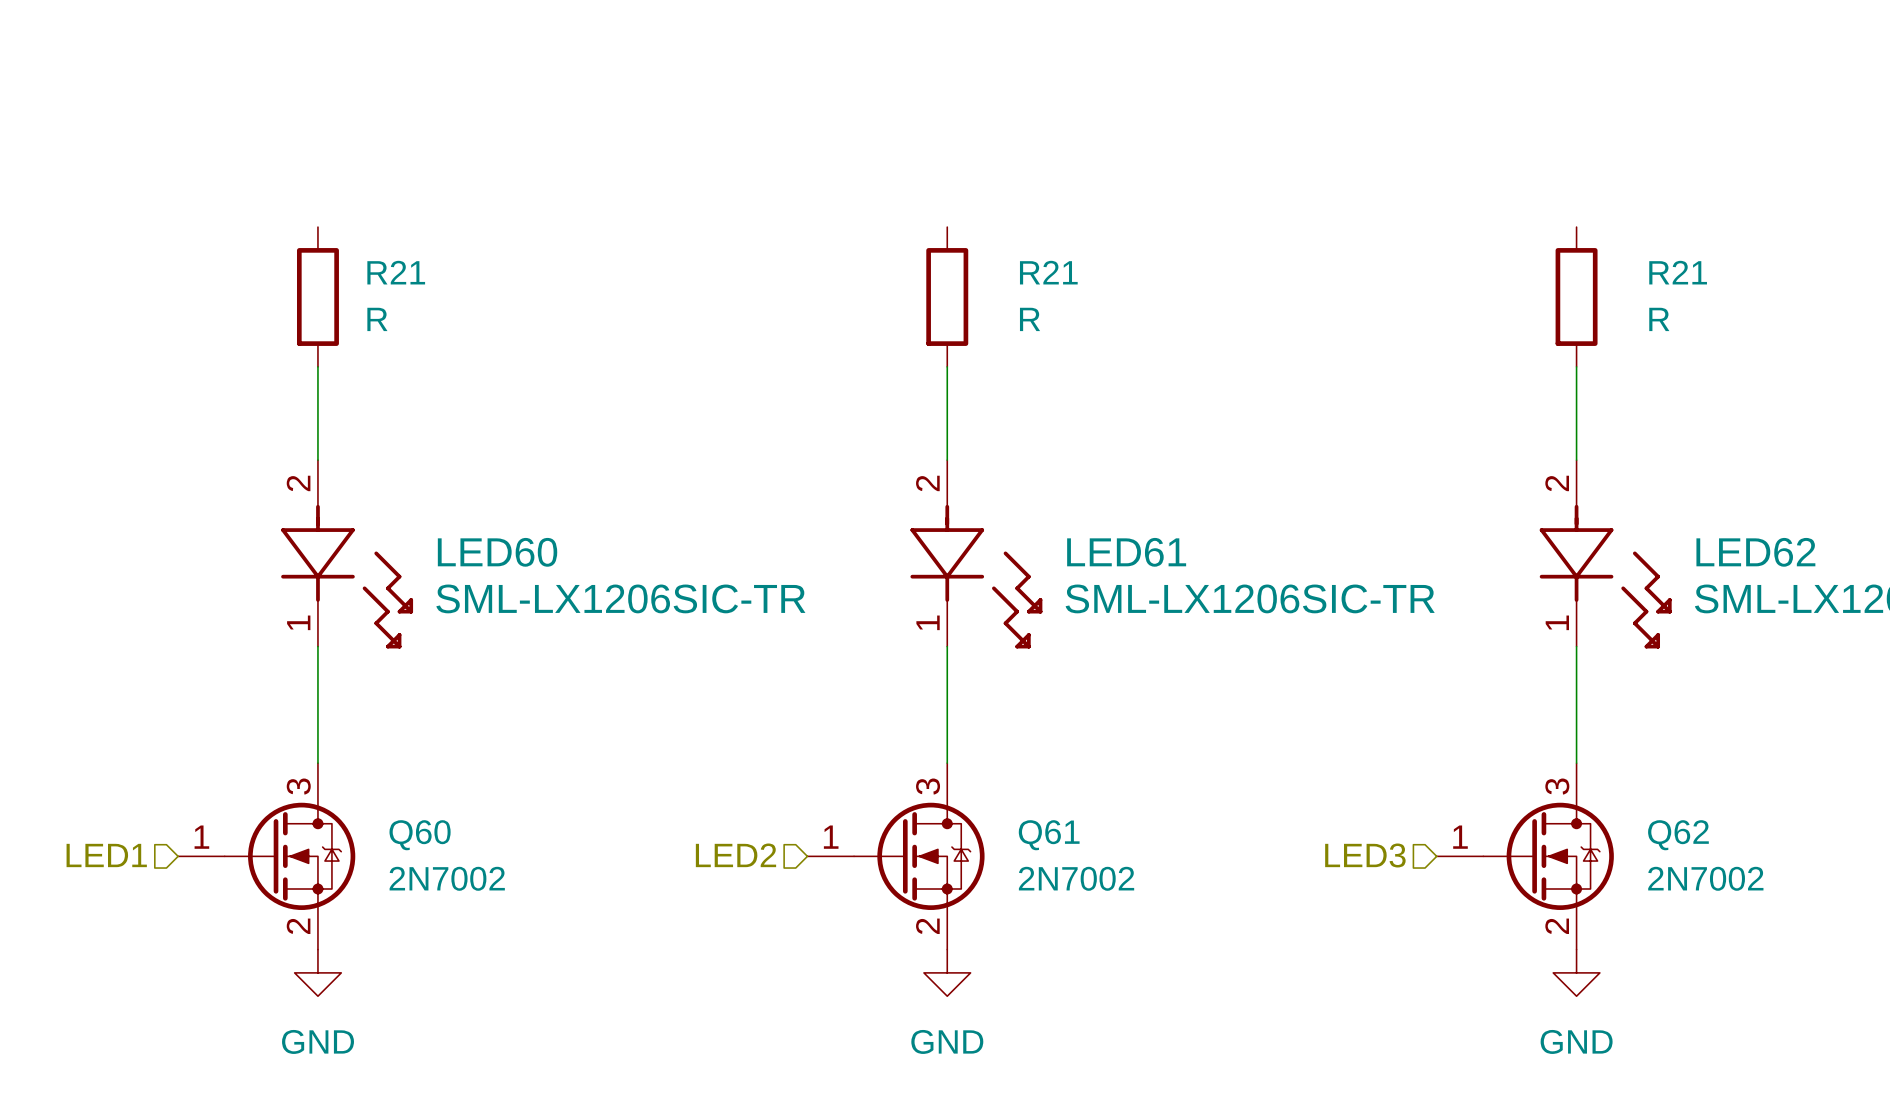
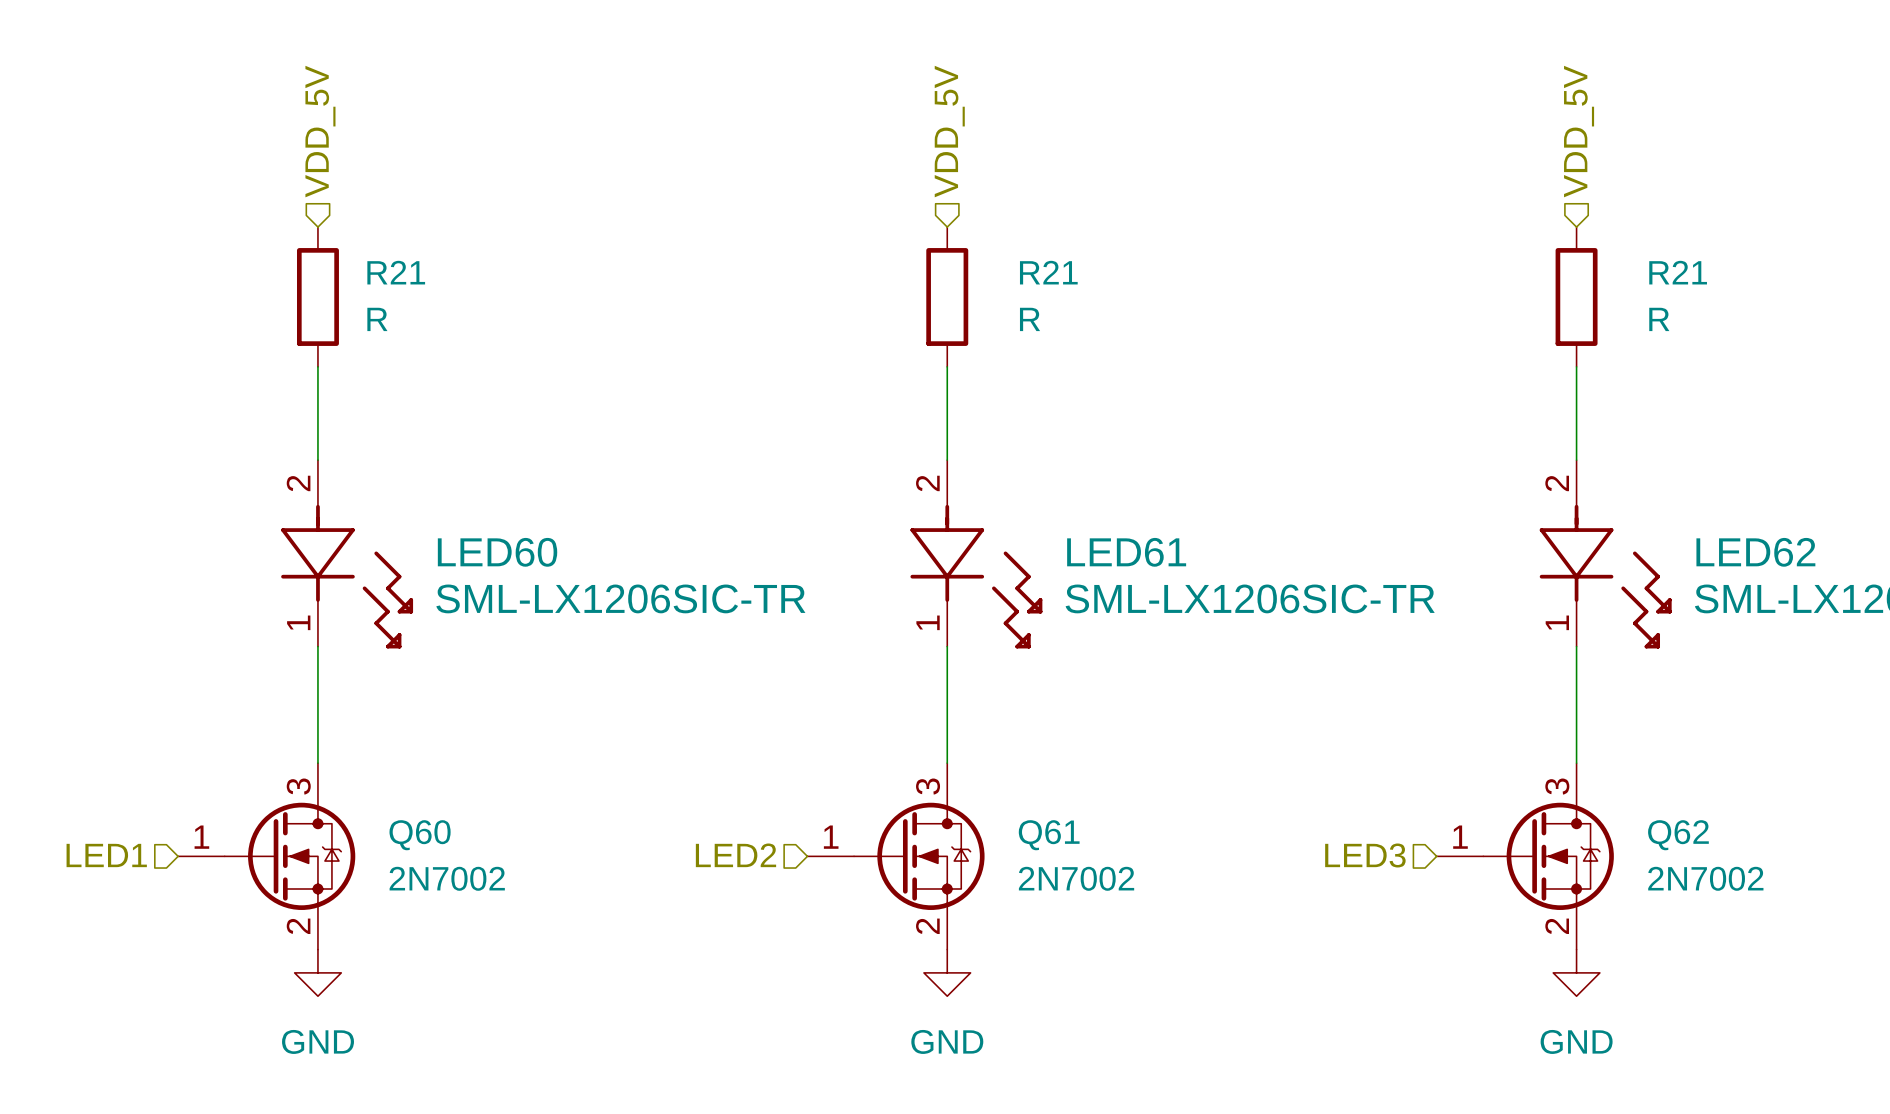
hierarchical label: none -> VDD_5V (320, 131)
hierarchical label: none -> VDD_5V (949, 131)
hierarchical label: none -> VDD_5V (1579, 131)

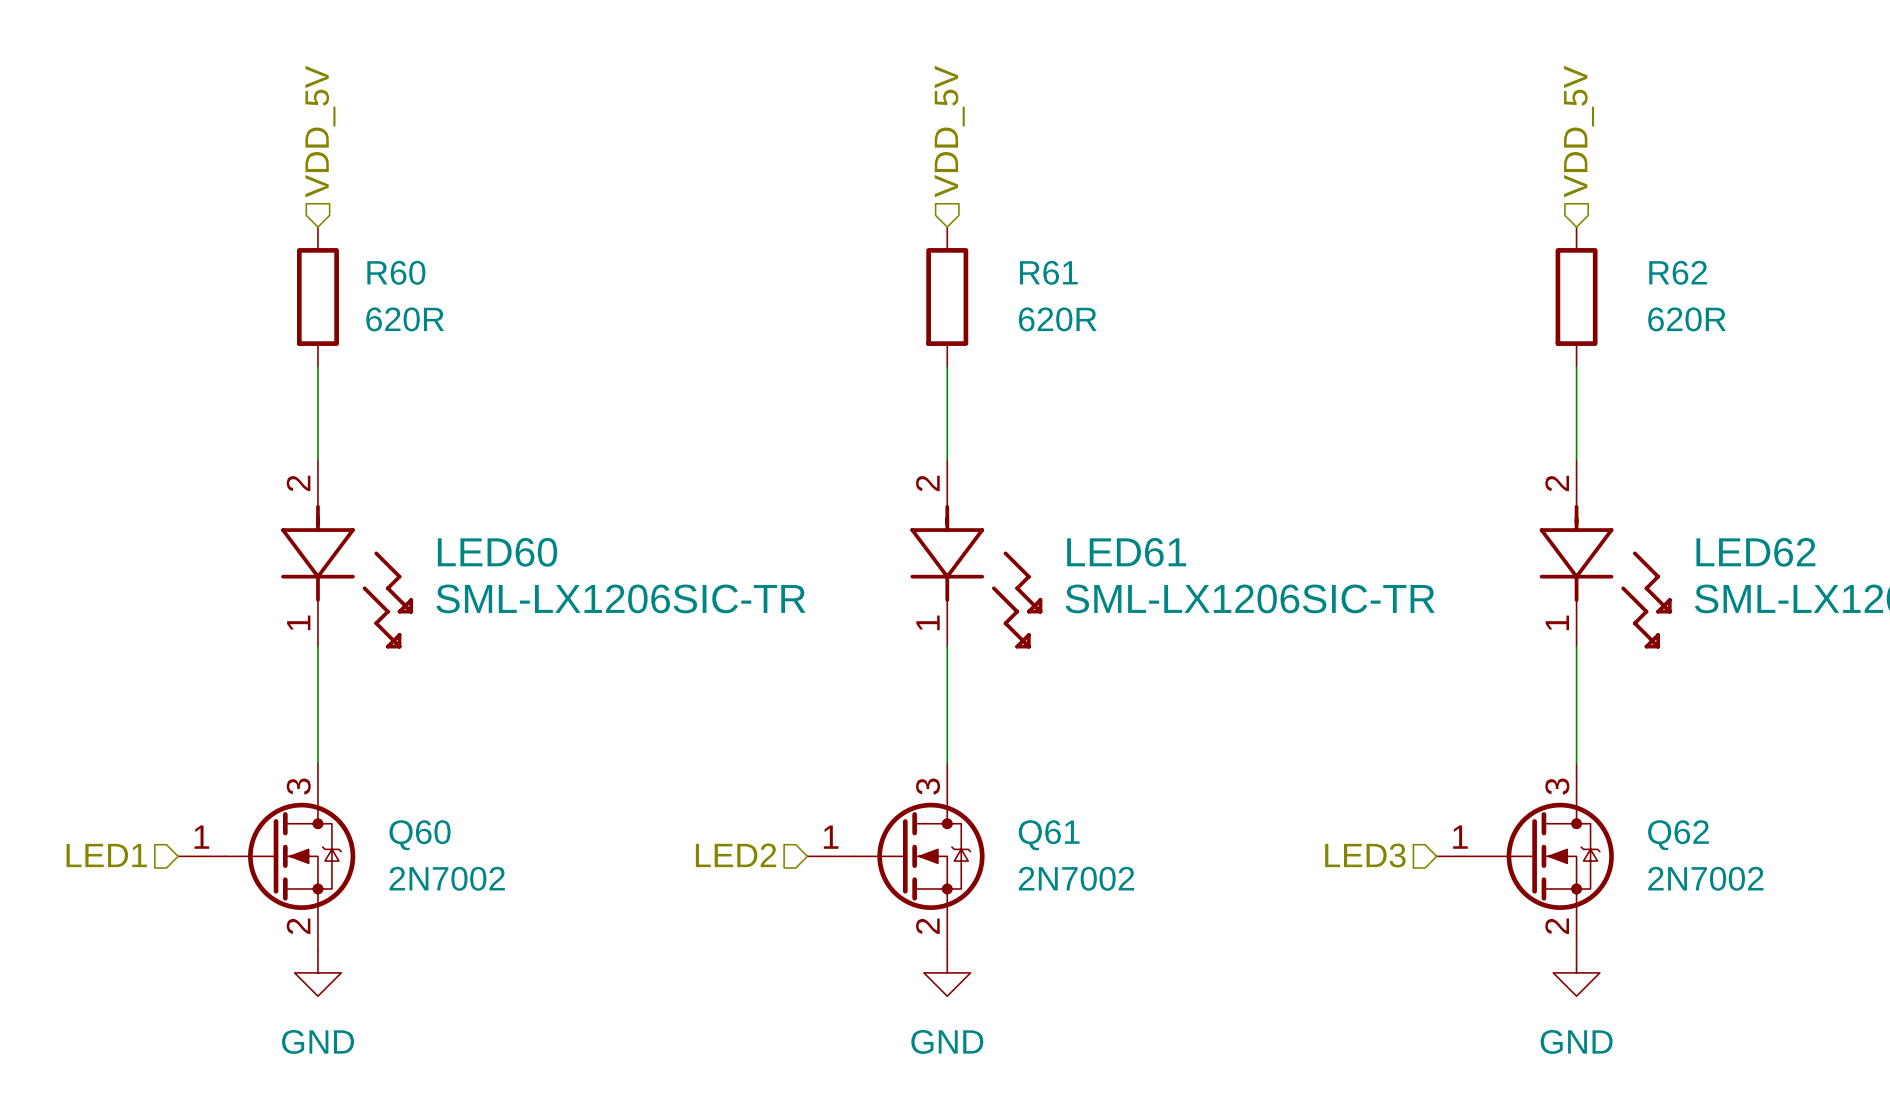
R21 name: R21 (396, 272) -> R60 (396, 272)
R21 name: R21 (1048, 272) -> R61 (1048, 272)
R21 name: R21 (1678, 272) -> R62 (1678, 272)
R21 value: R (377, 319) -> 620R (405, 319)
R21 value: R (1030, 319) -> 620R (1057, 319)
R21 value: R (1659, 319) -> 620R (1687, 319)

